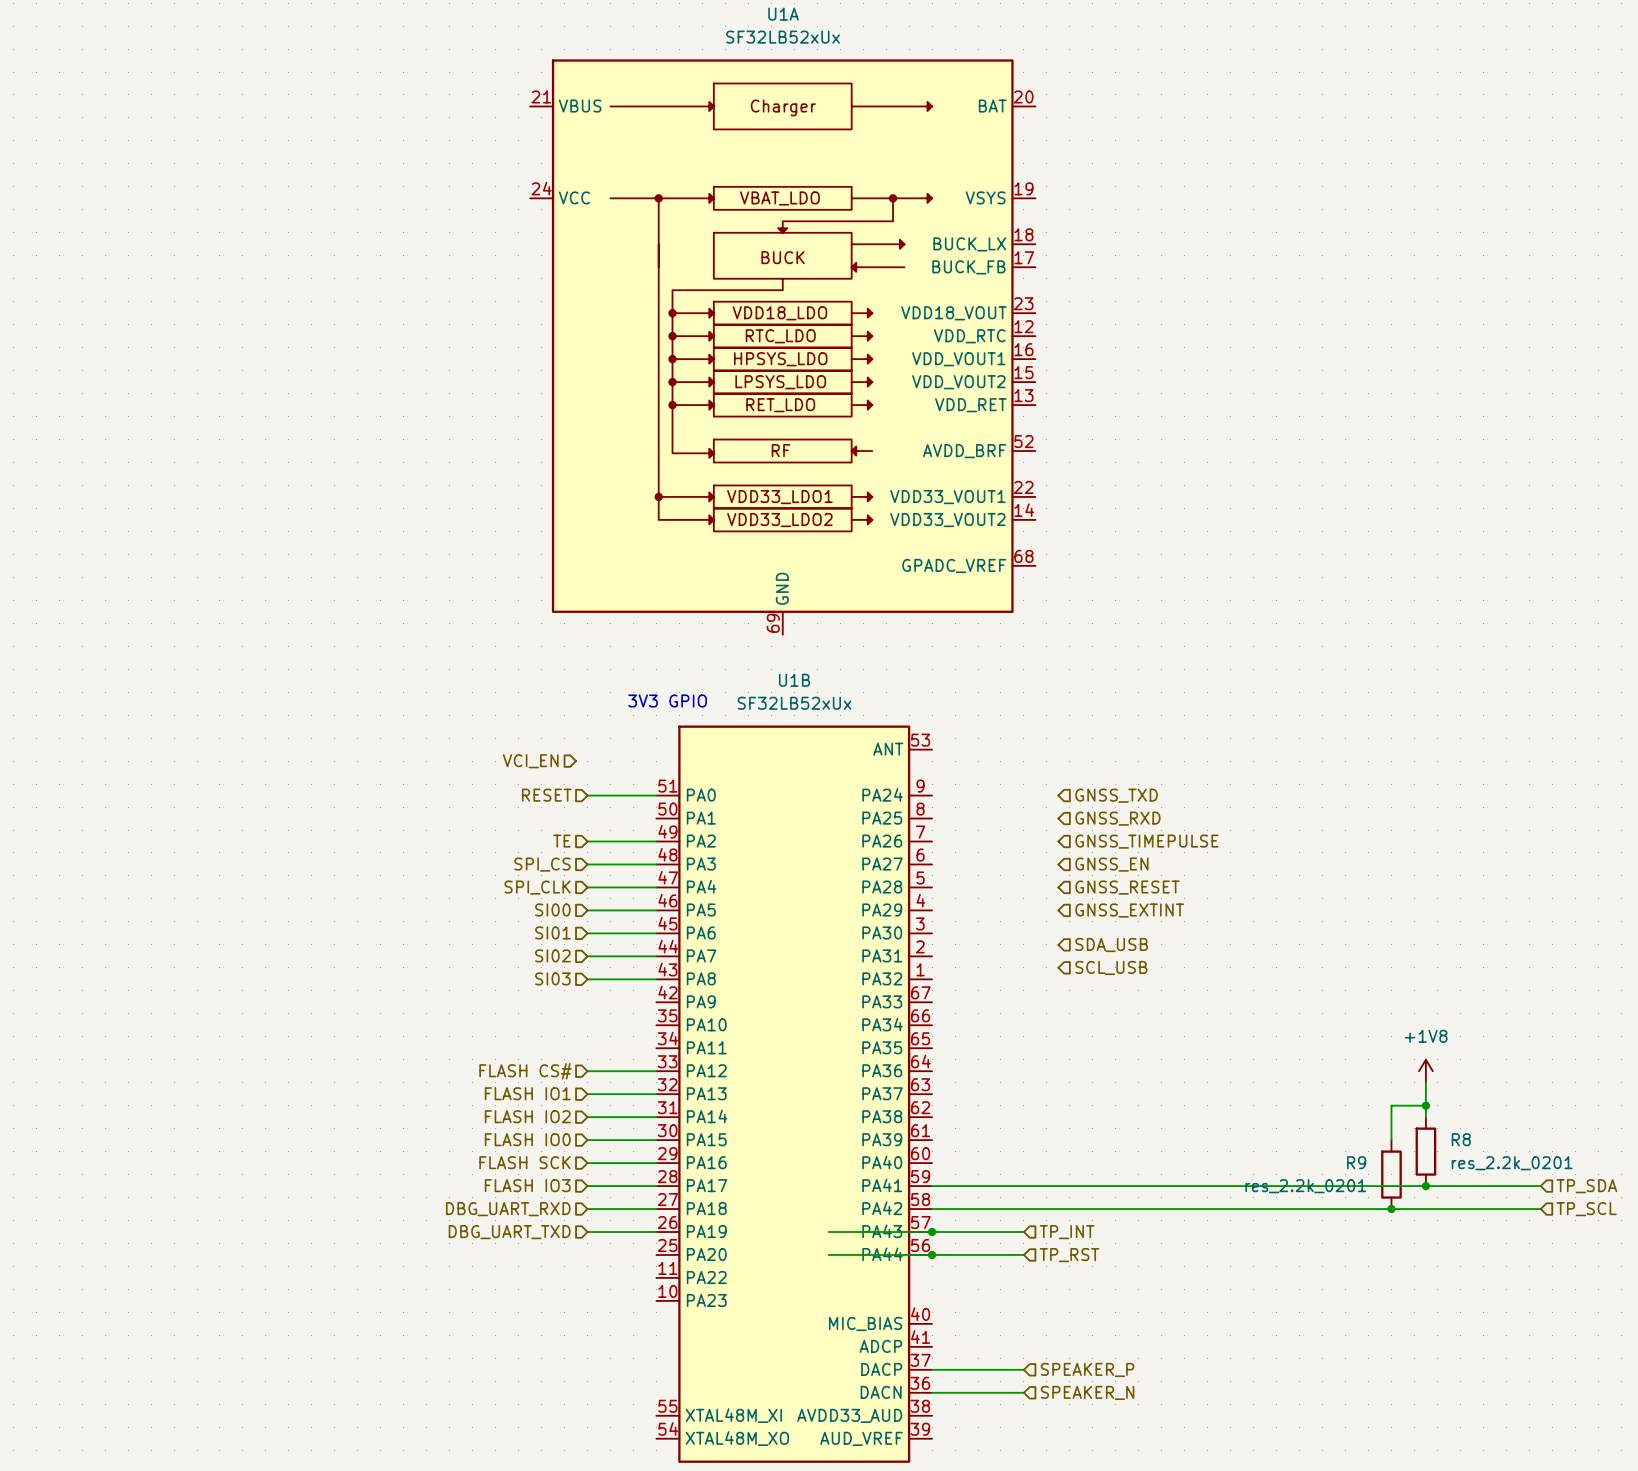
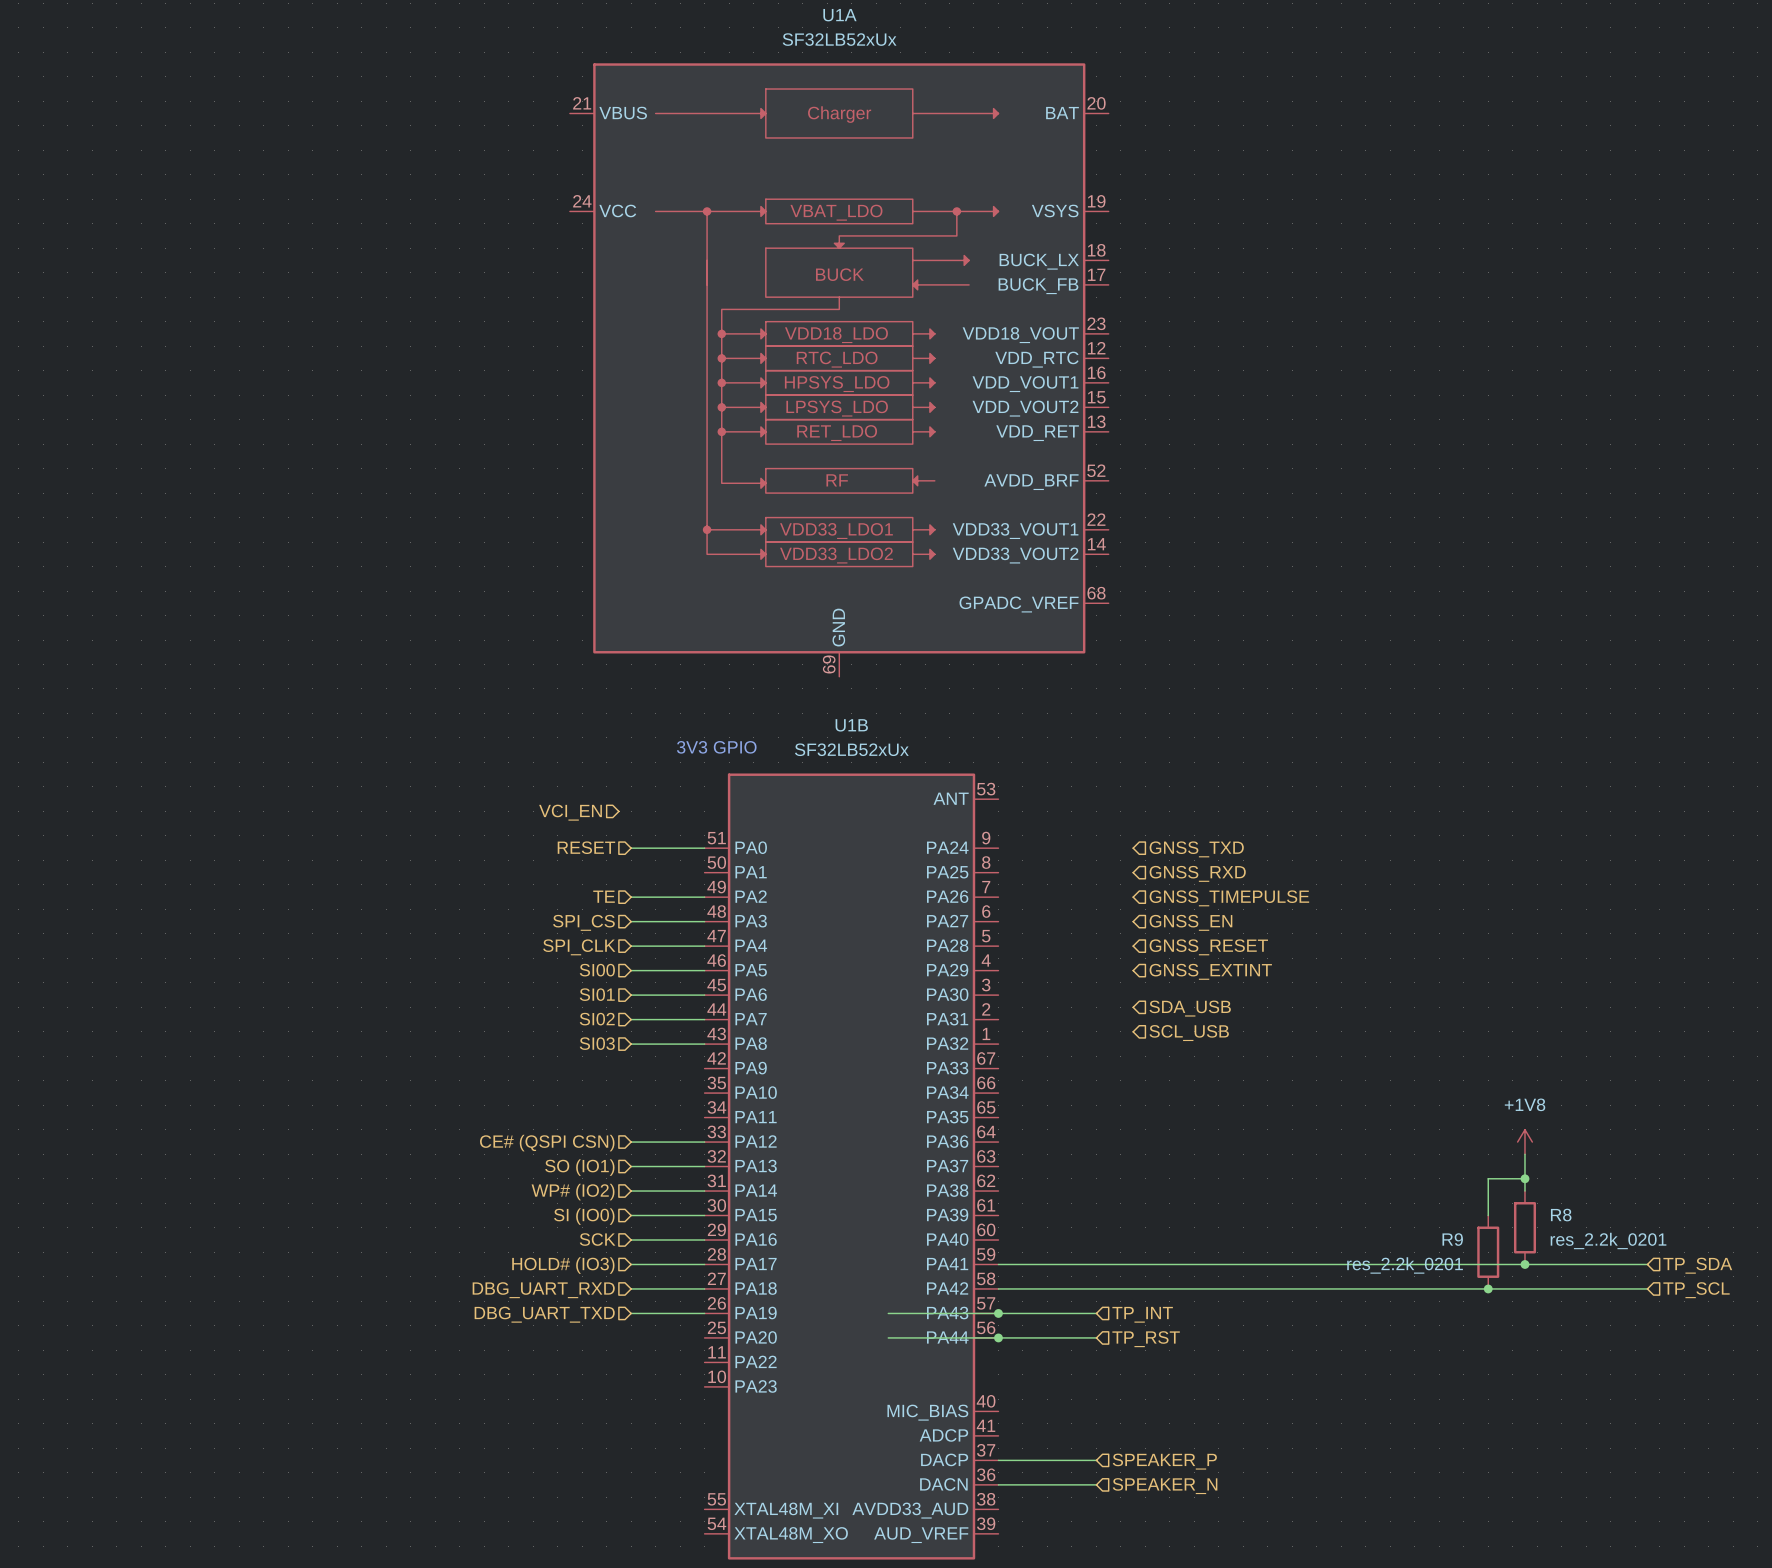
hierarchical label: FLASH CS# (525, 1071) -> CE# (QSPI CSN) (547, 1143)
hierarchical label: FLASH IO1 (527, 1093) -> SO (IO1) (579, 1167)
hierarchical label: FLASH IO2 (527, 1116) -> WP# (IO2) (573, 1192)
hierarchical label: FLASH IO0 (527, 1139) -> SI (IO0) (584, 1216)
hierarchical label: FLASH SCK (524, 1162) -> SCK (597, 1239)
hierarchical label: FLASH IO3 (527, 1185) -> HOLD# (IO3) (563, 1265)

